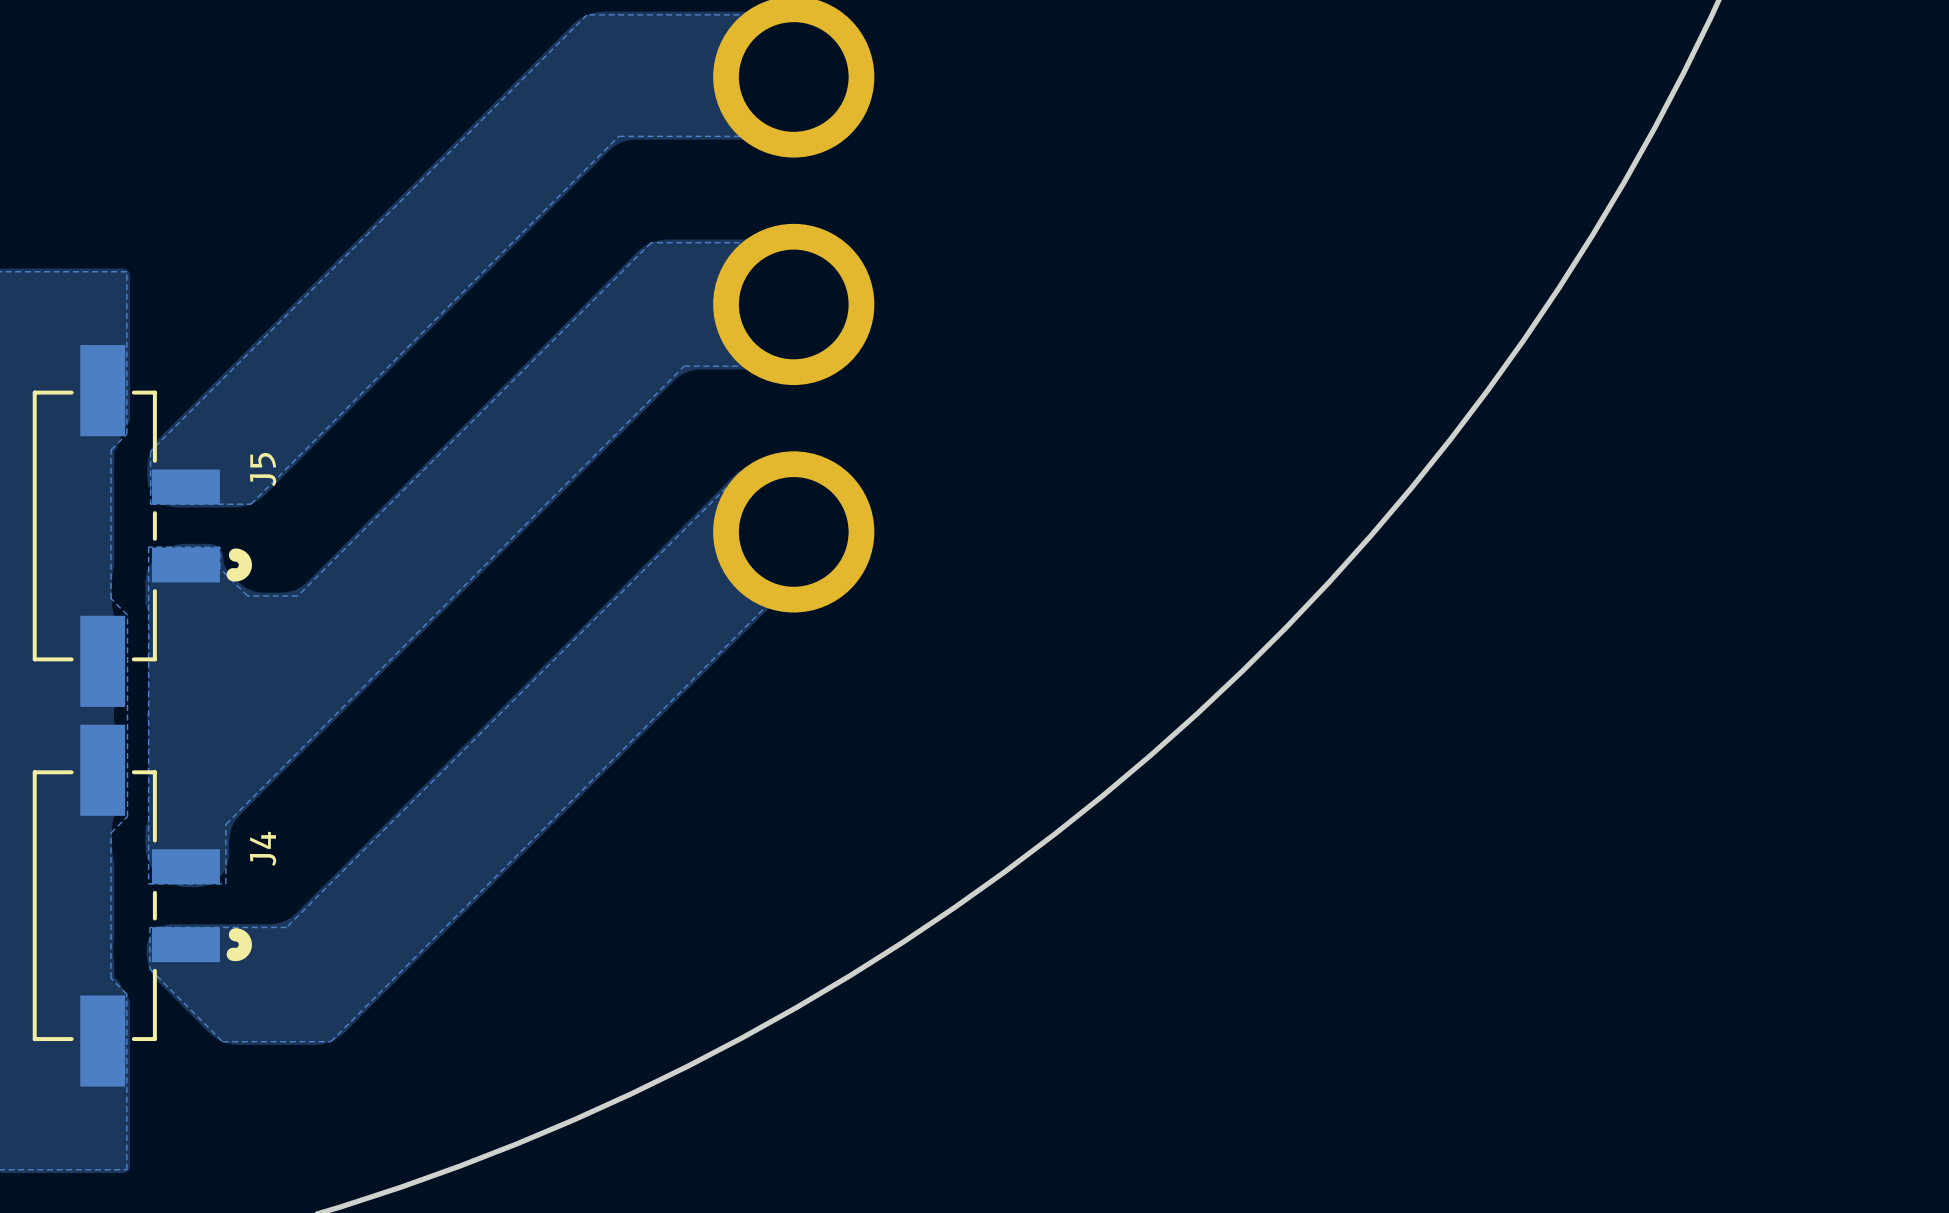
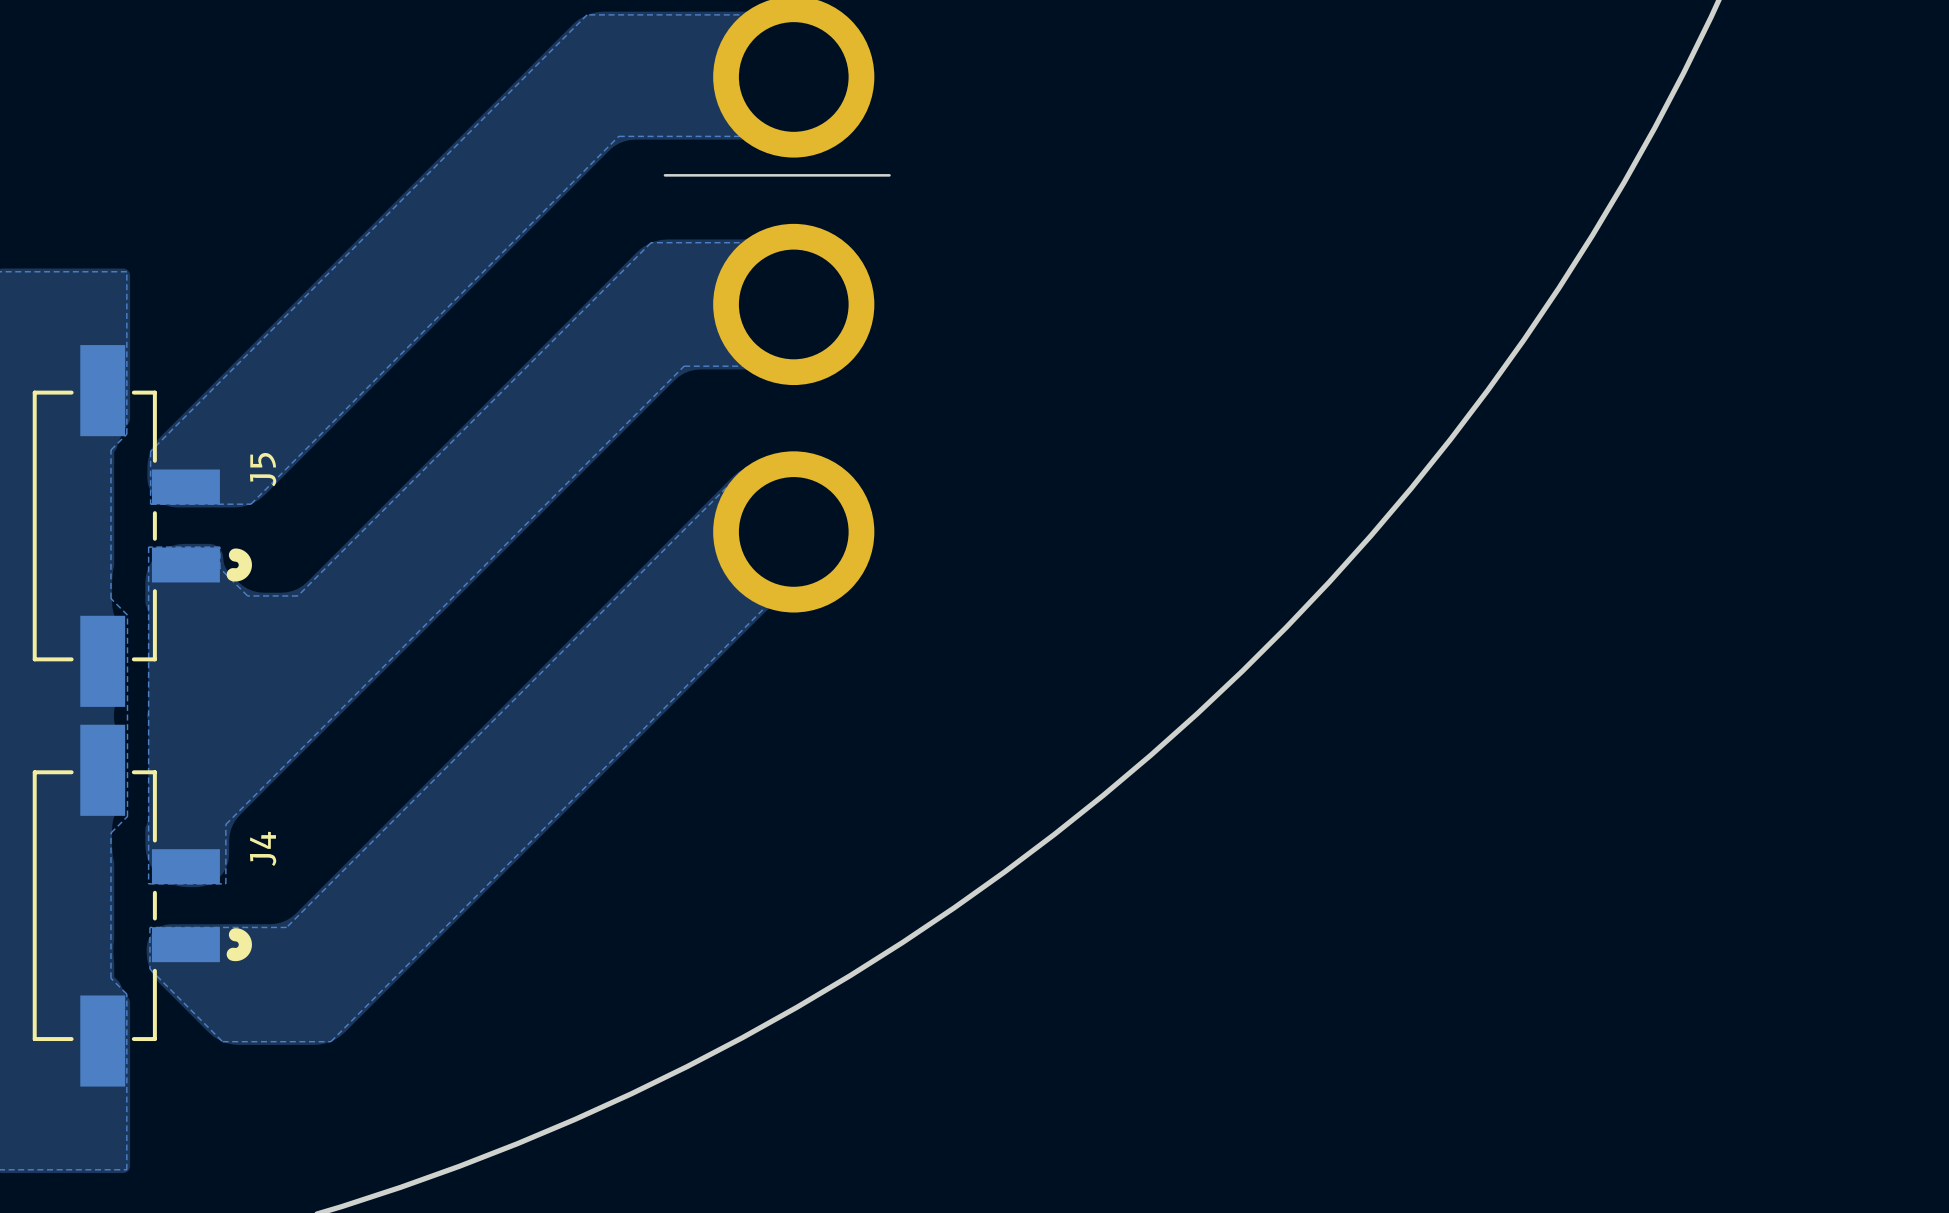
board edge: none -> (889, 175) (664, 175)

